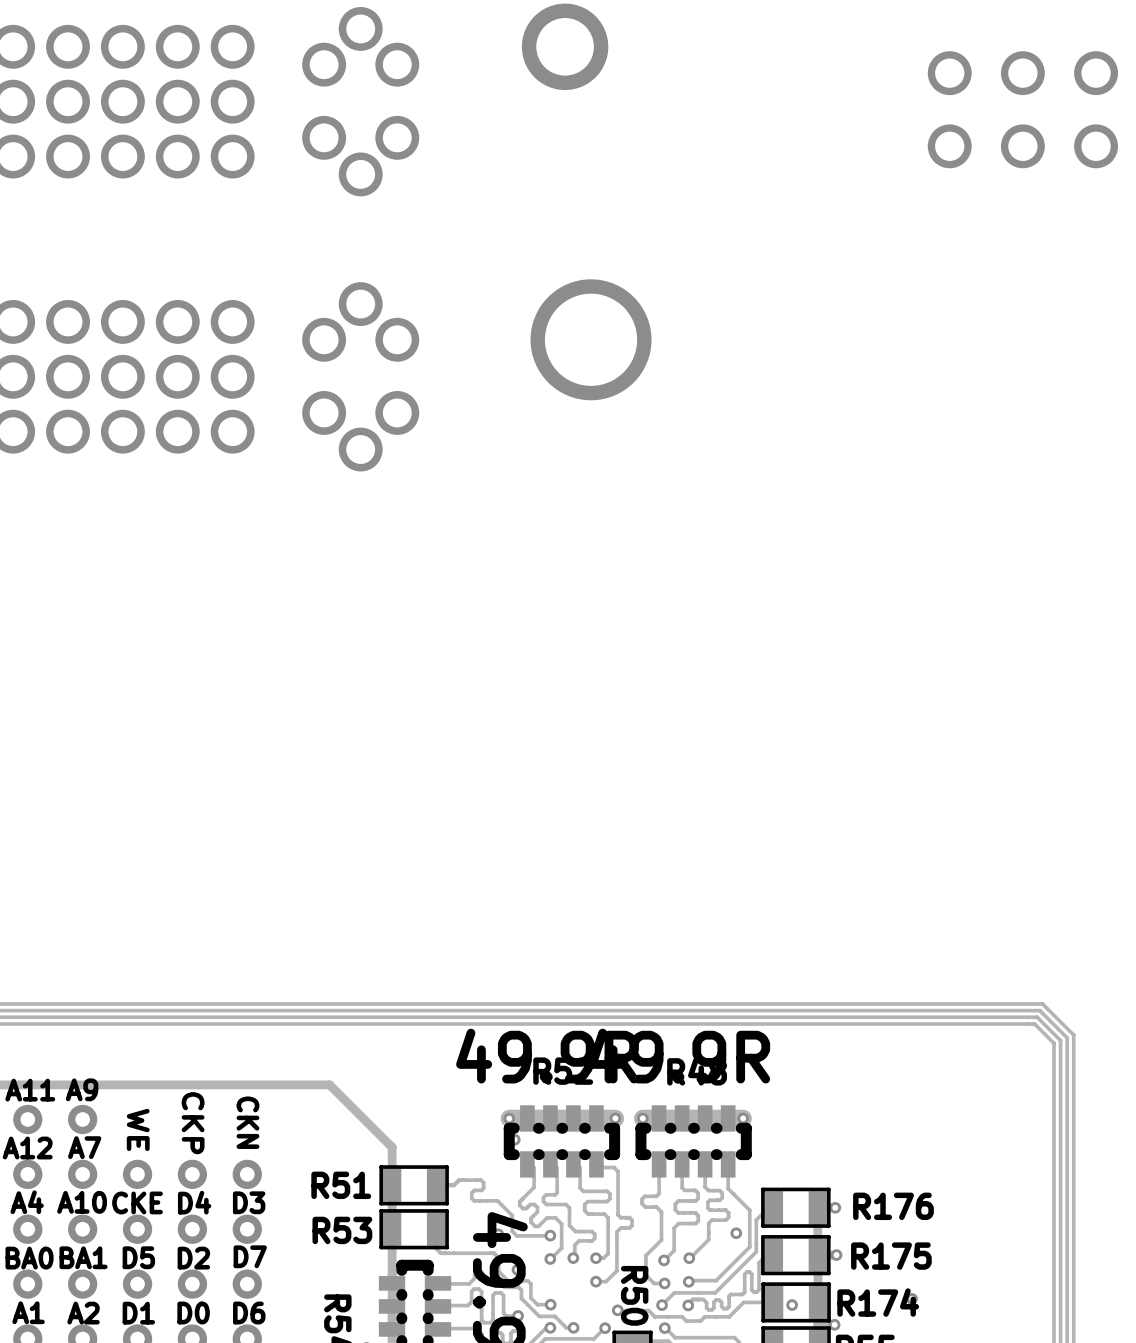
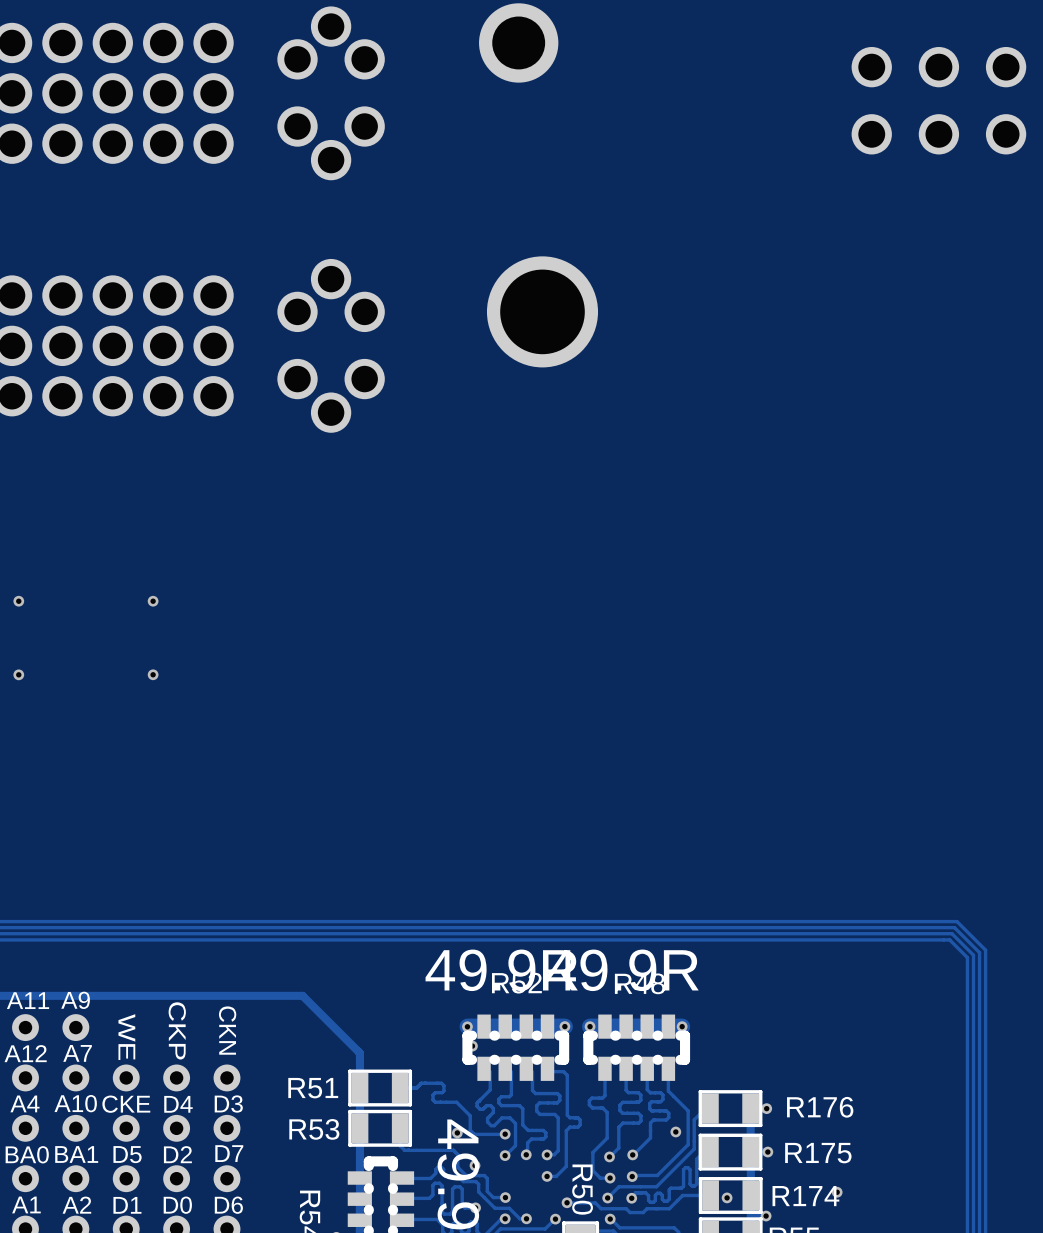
via: none -> (18, 601)
via: none -> (153, 601)
via: none -> (18, 674)
via: none -> (153, 674)

